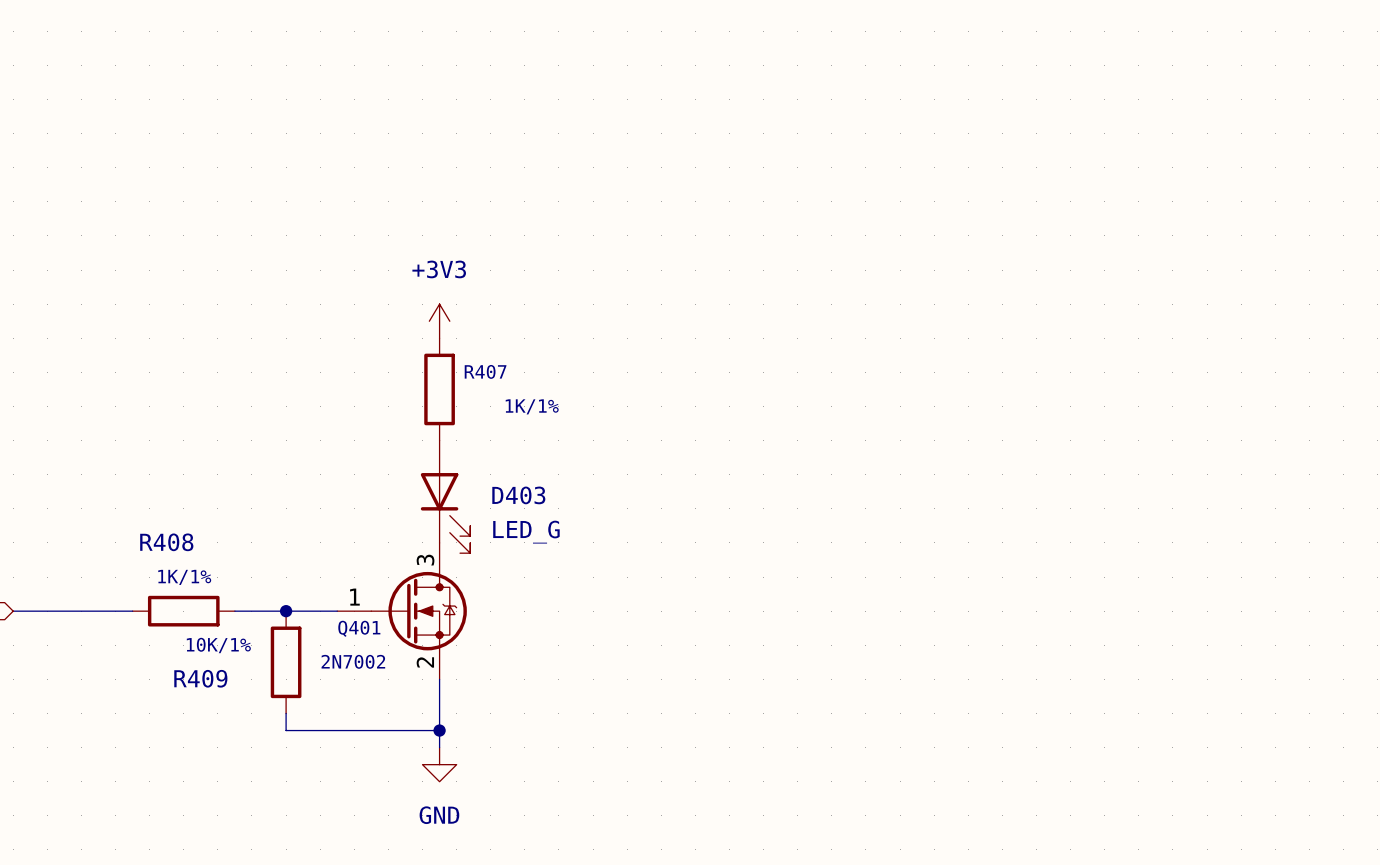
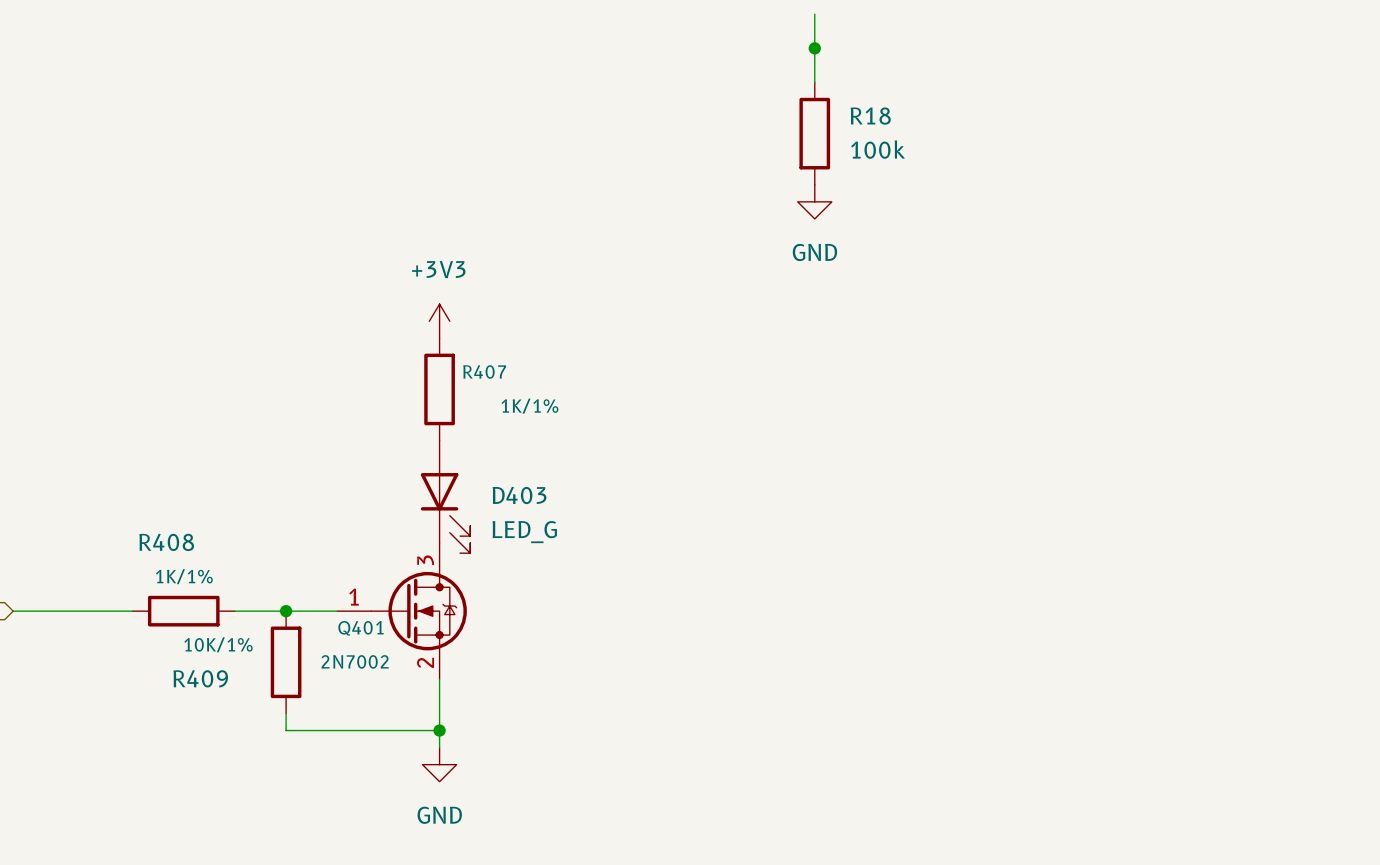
wire: none -> (814, 14) (814, 82)
junction: none -> (814, 48)
R18: none -> 100k (814, 133)
power symbol: none -> GND (814, 201)

